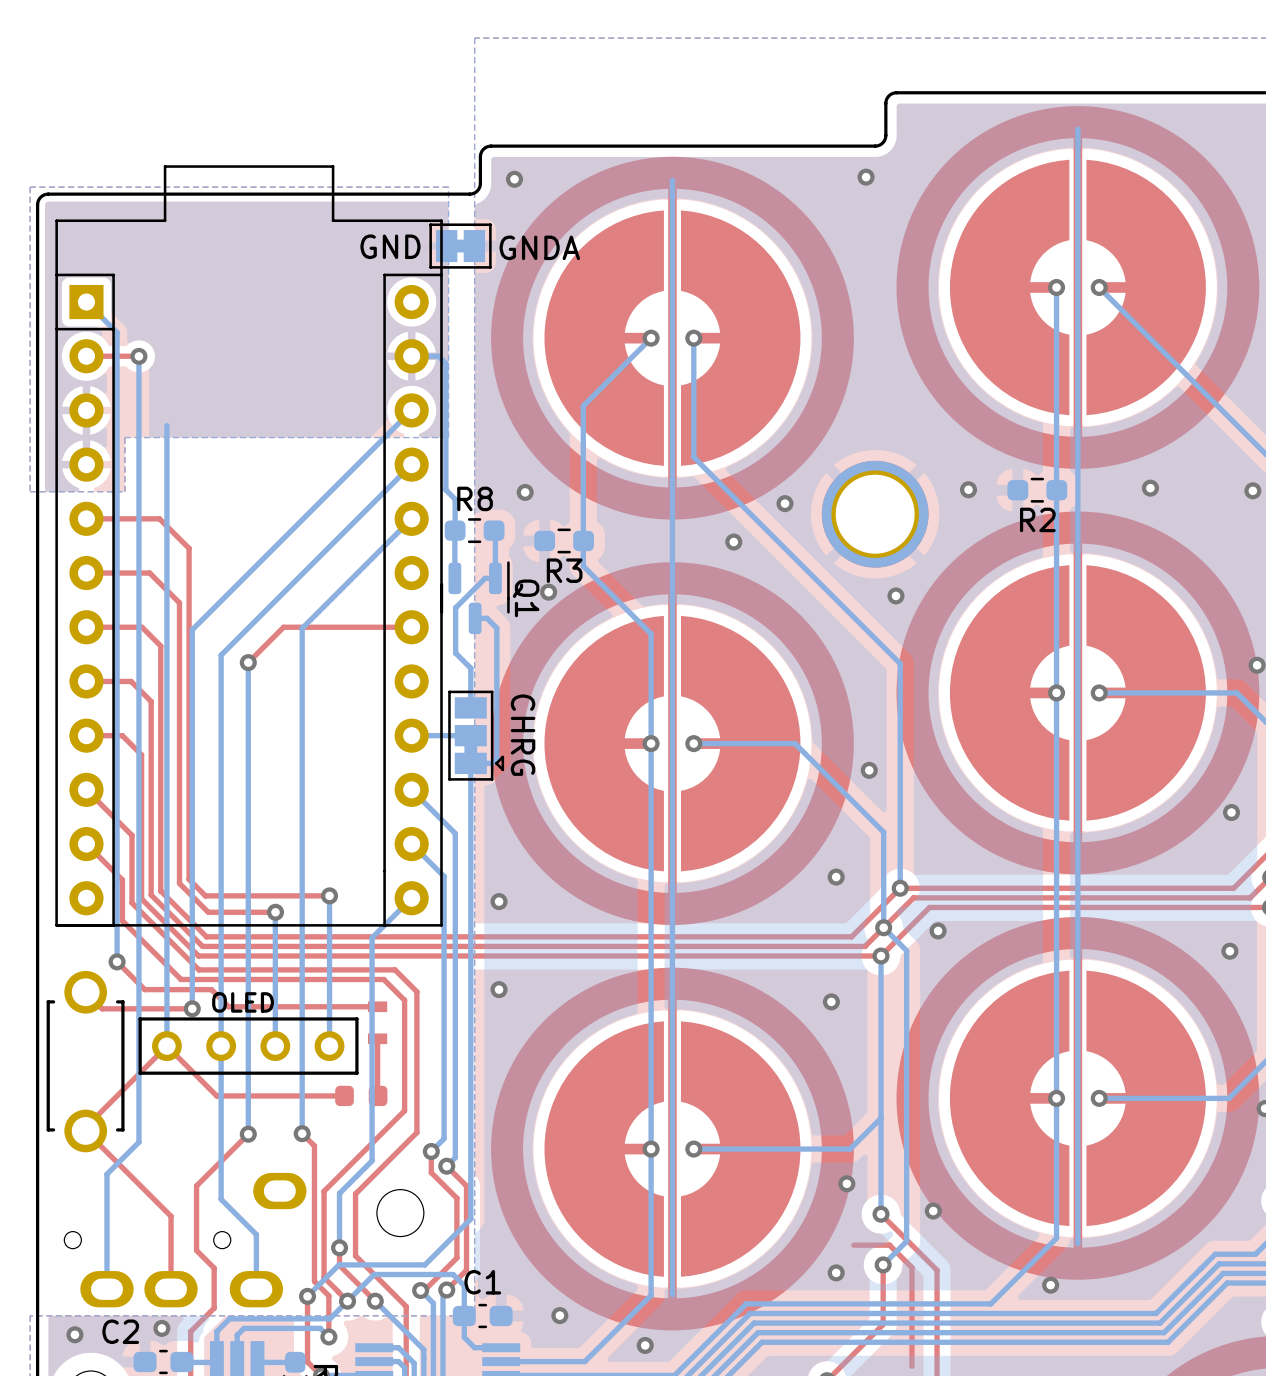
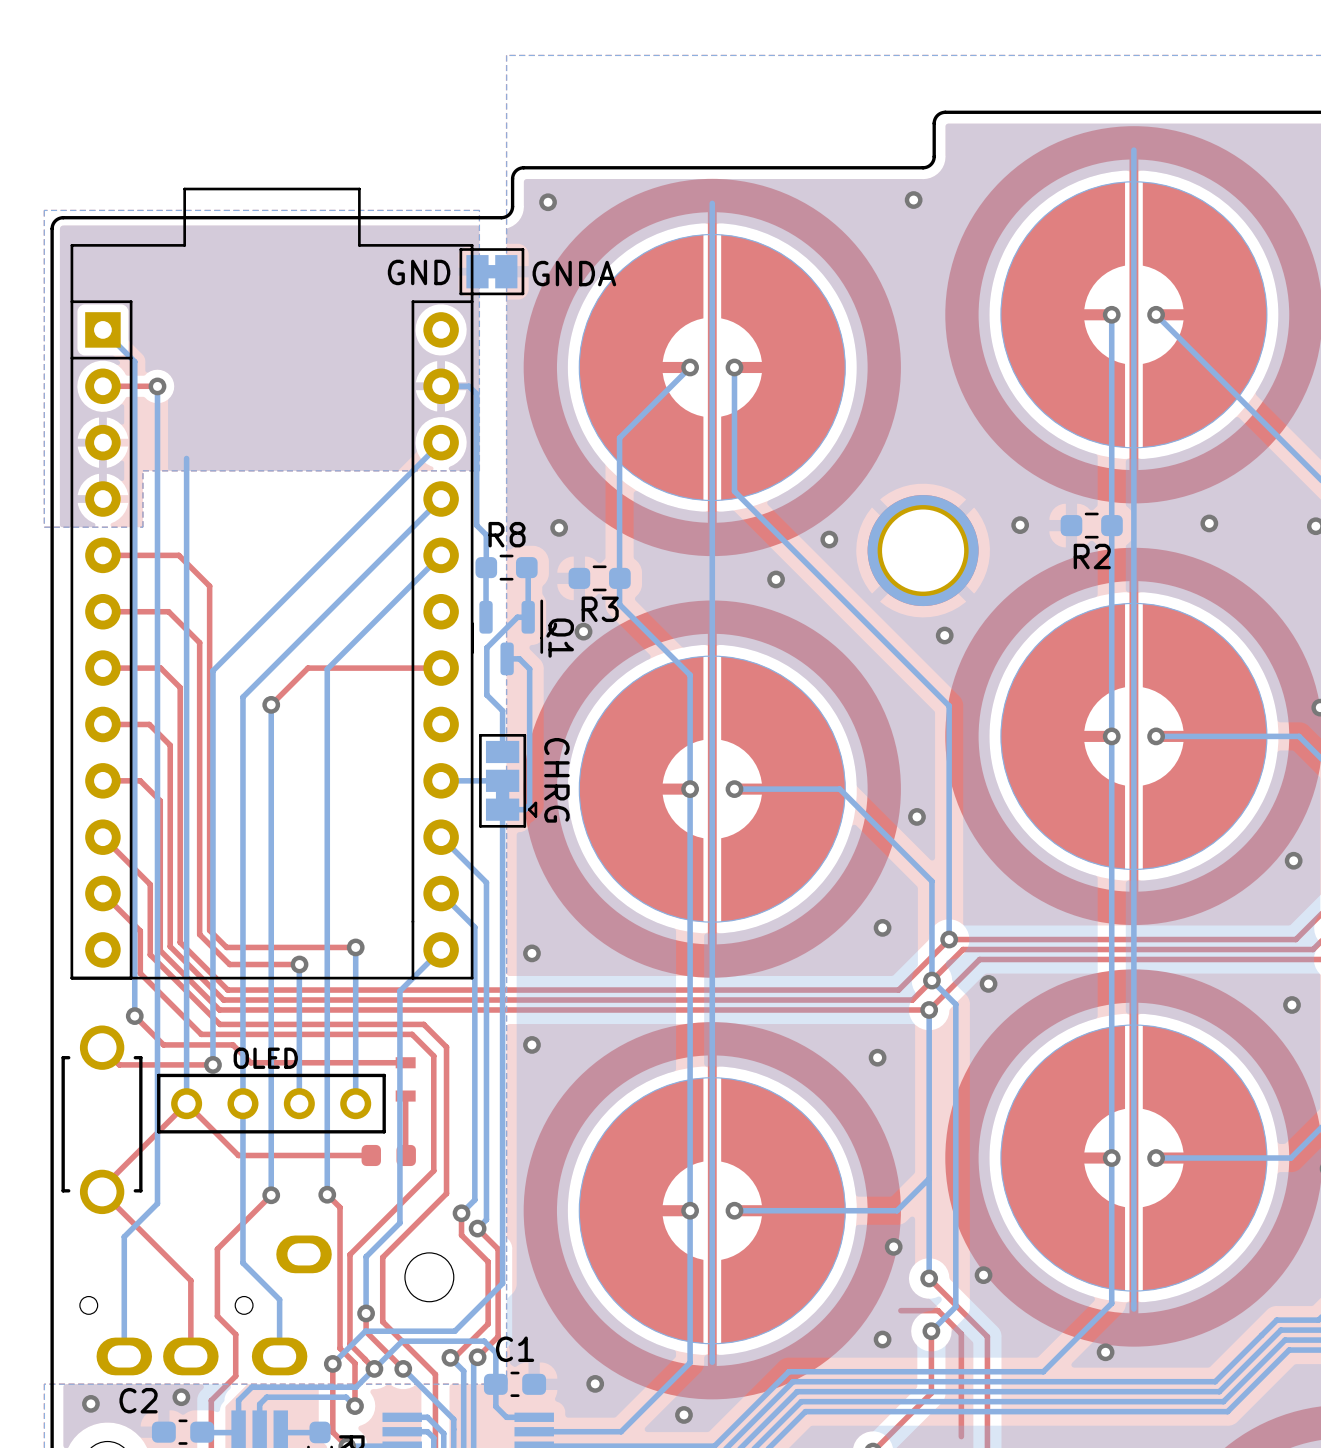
drawing: none -> [1000, 181, 1267, 448]
drawing: none -> [579, 234, 846, 501]
drawing: none -> [1000, 603, 1267, 870]
drawing: none -> [579, 656, 846, 923]
drawing: none -> [1000, 1024, 1267, 1292]
drawing: none -> [579, 1077, 846, 1344]

